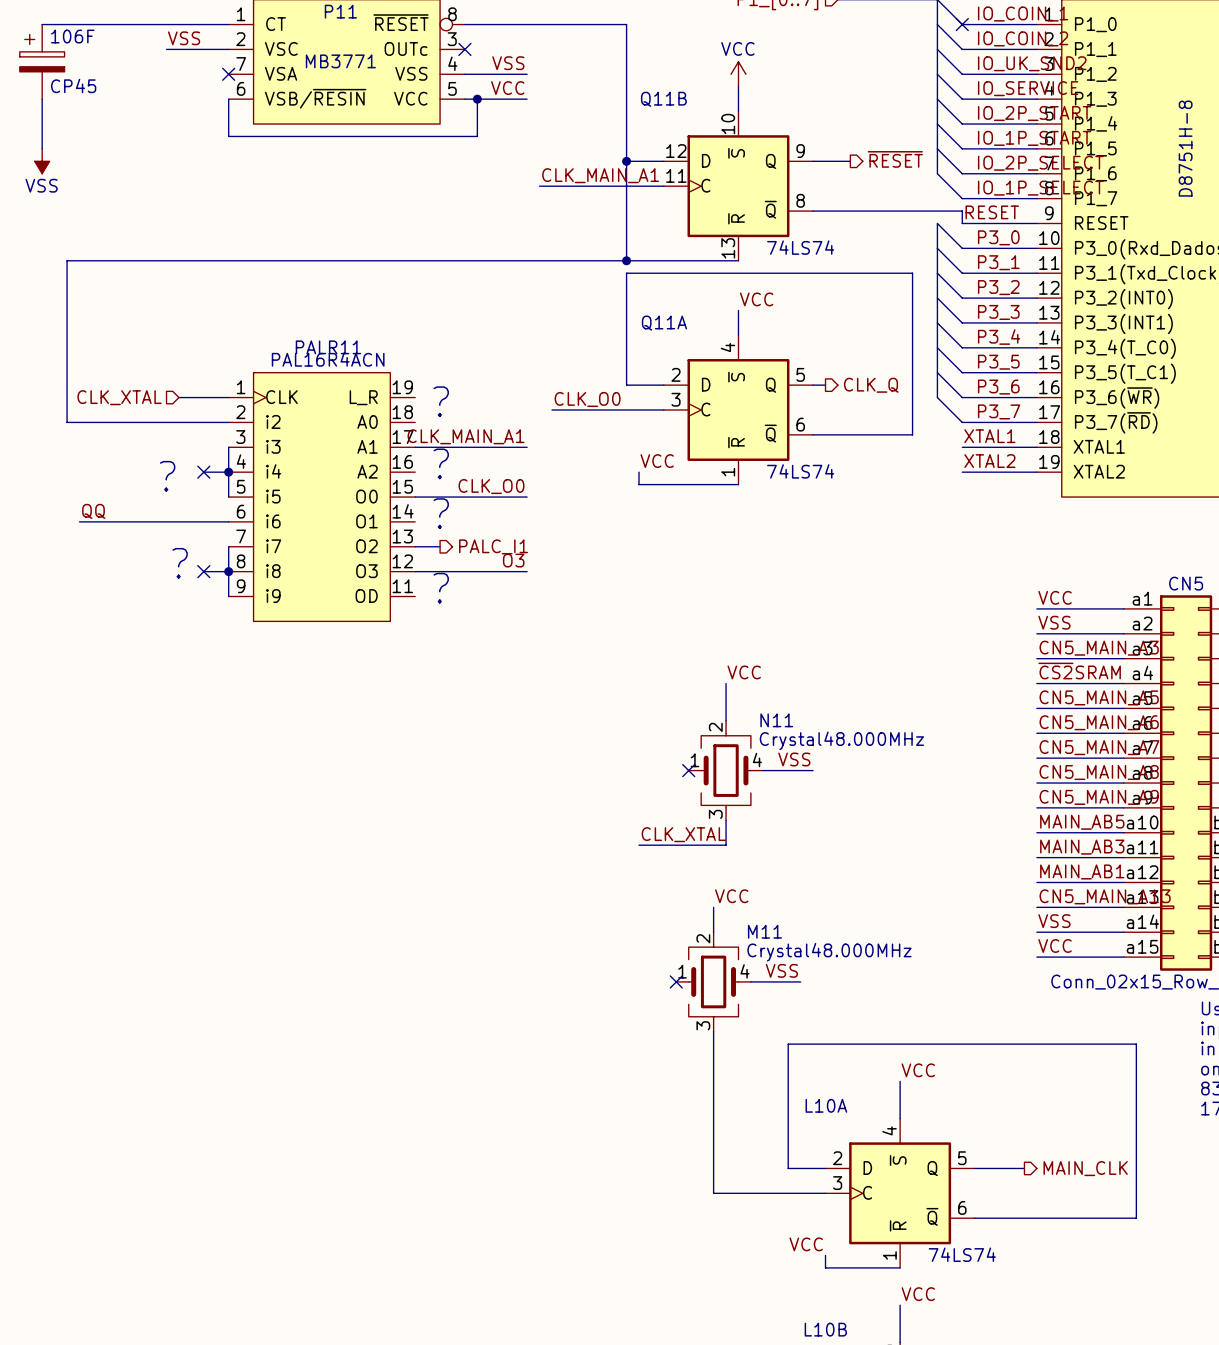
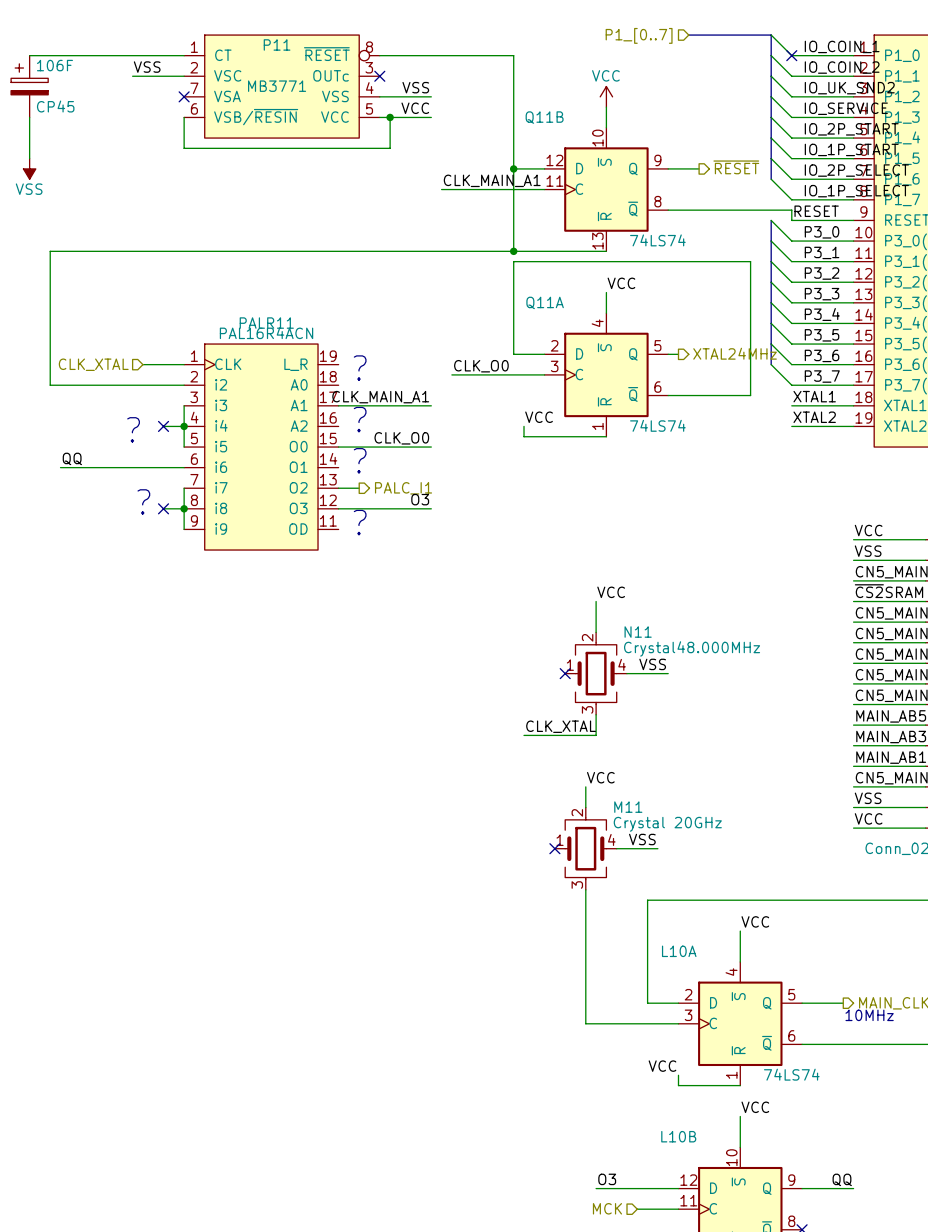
hierarchical label: CLK_Q (871, 385) -> XTAL24MHz (735, 353)
M11 value: Crystal48.000MHz (829, 952) -> Crystal 20GHz (667, 824)
text: none -> 10MHz (869, 1015)

